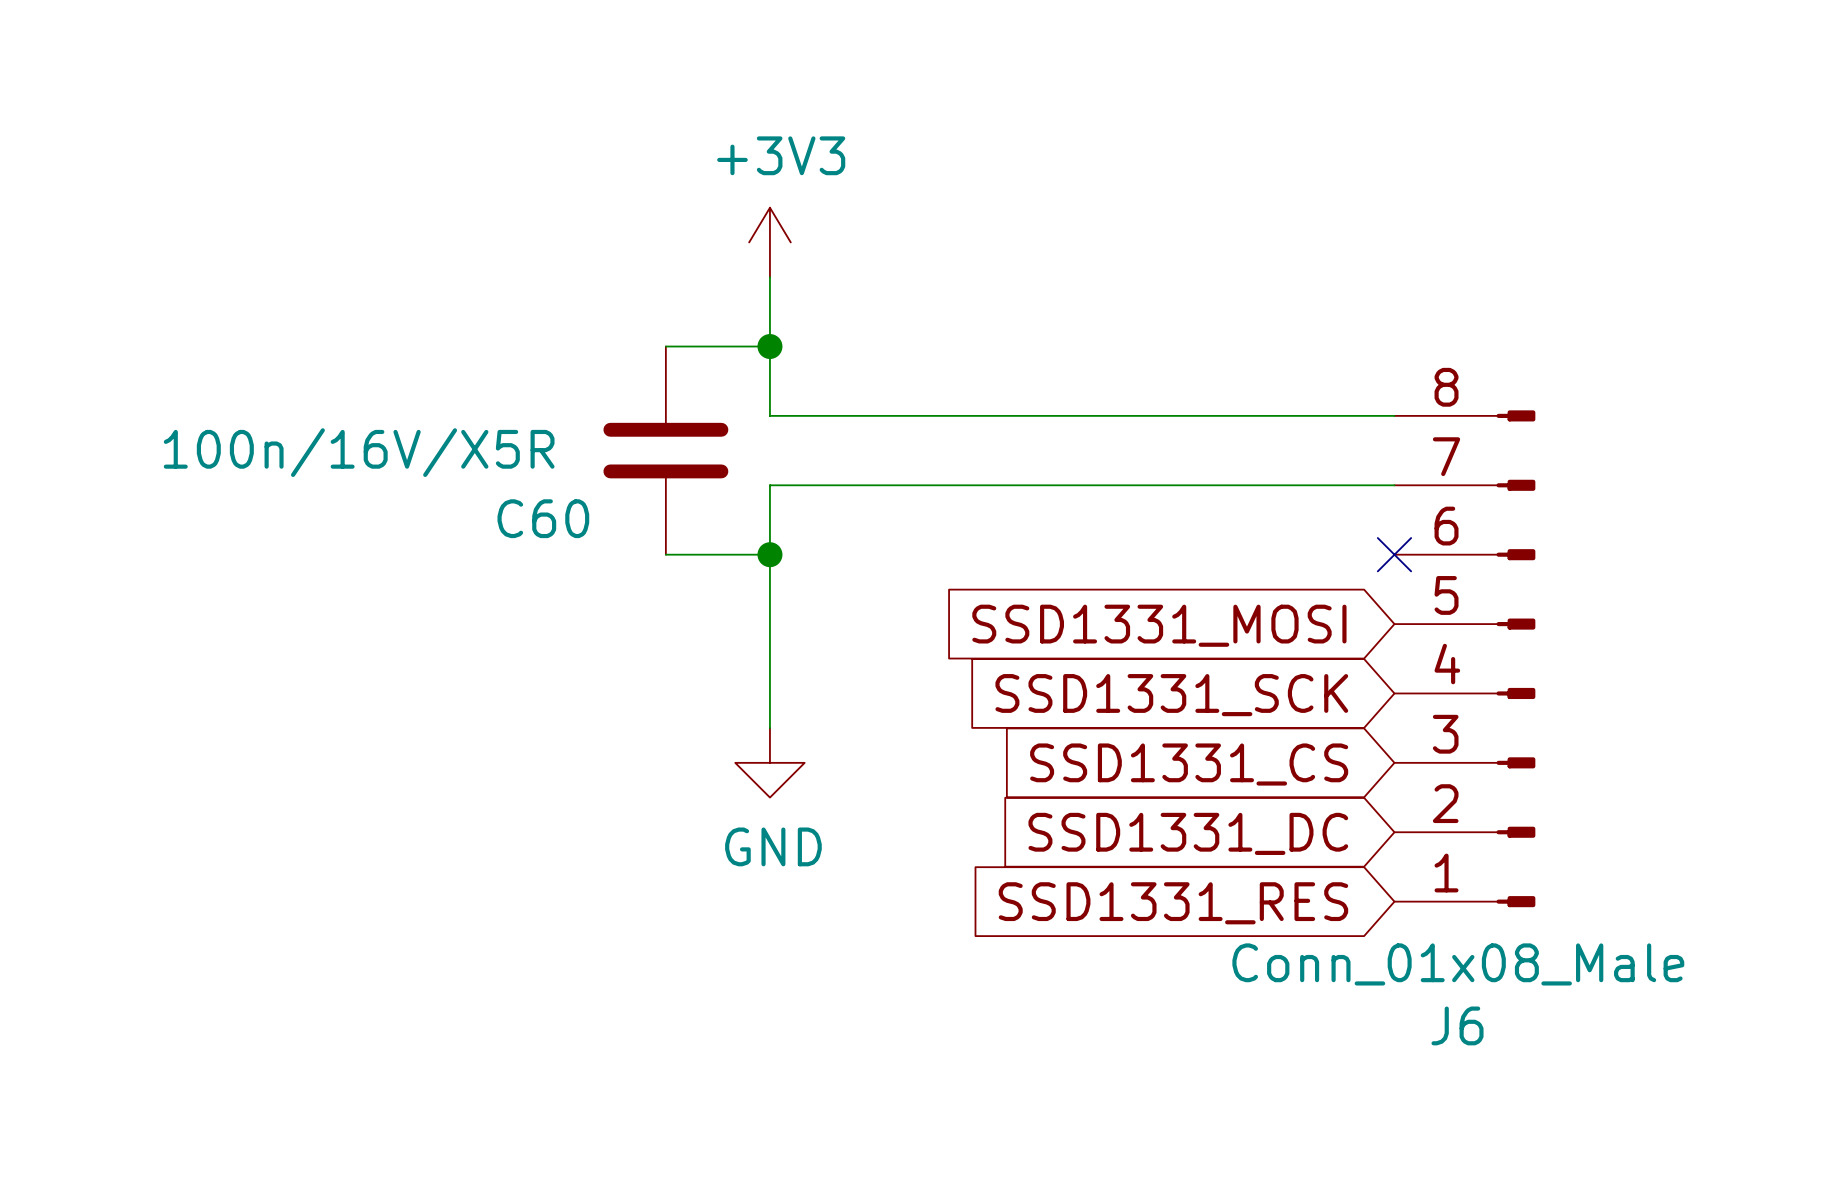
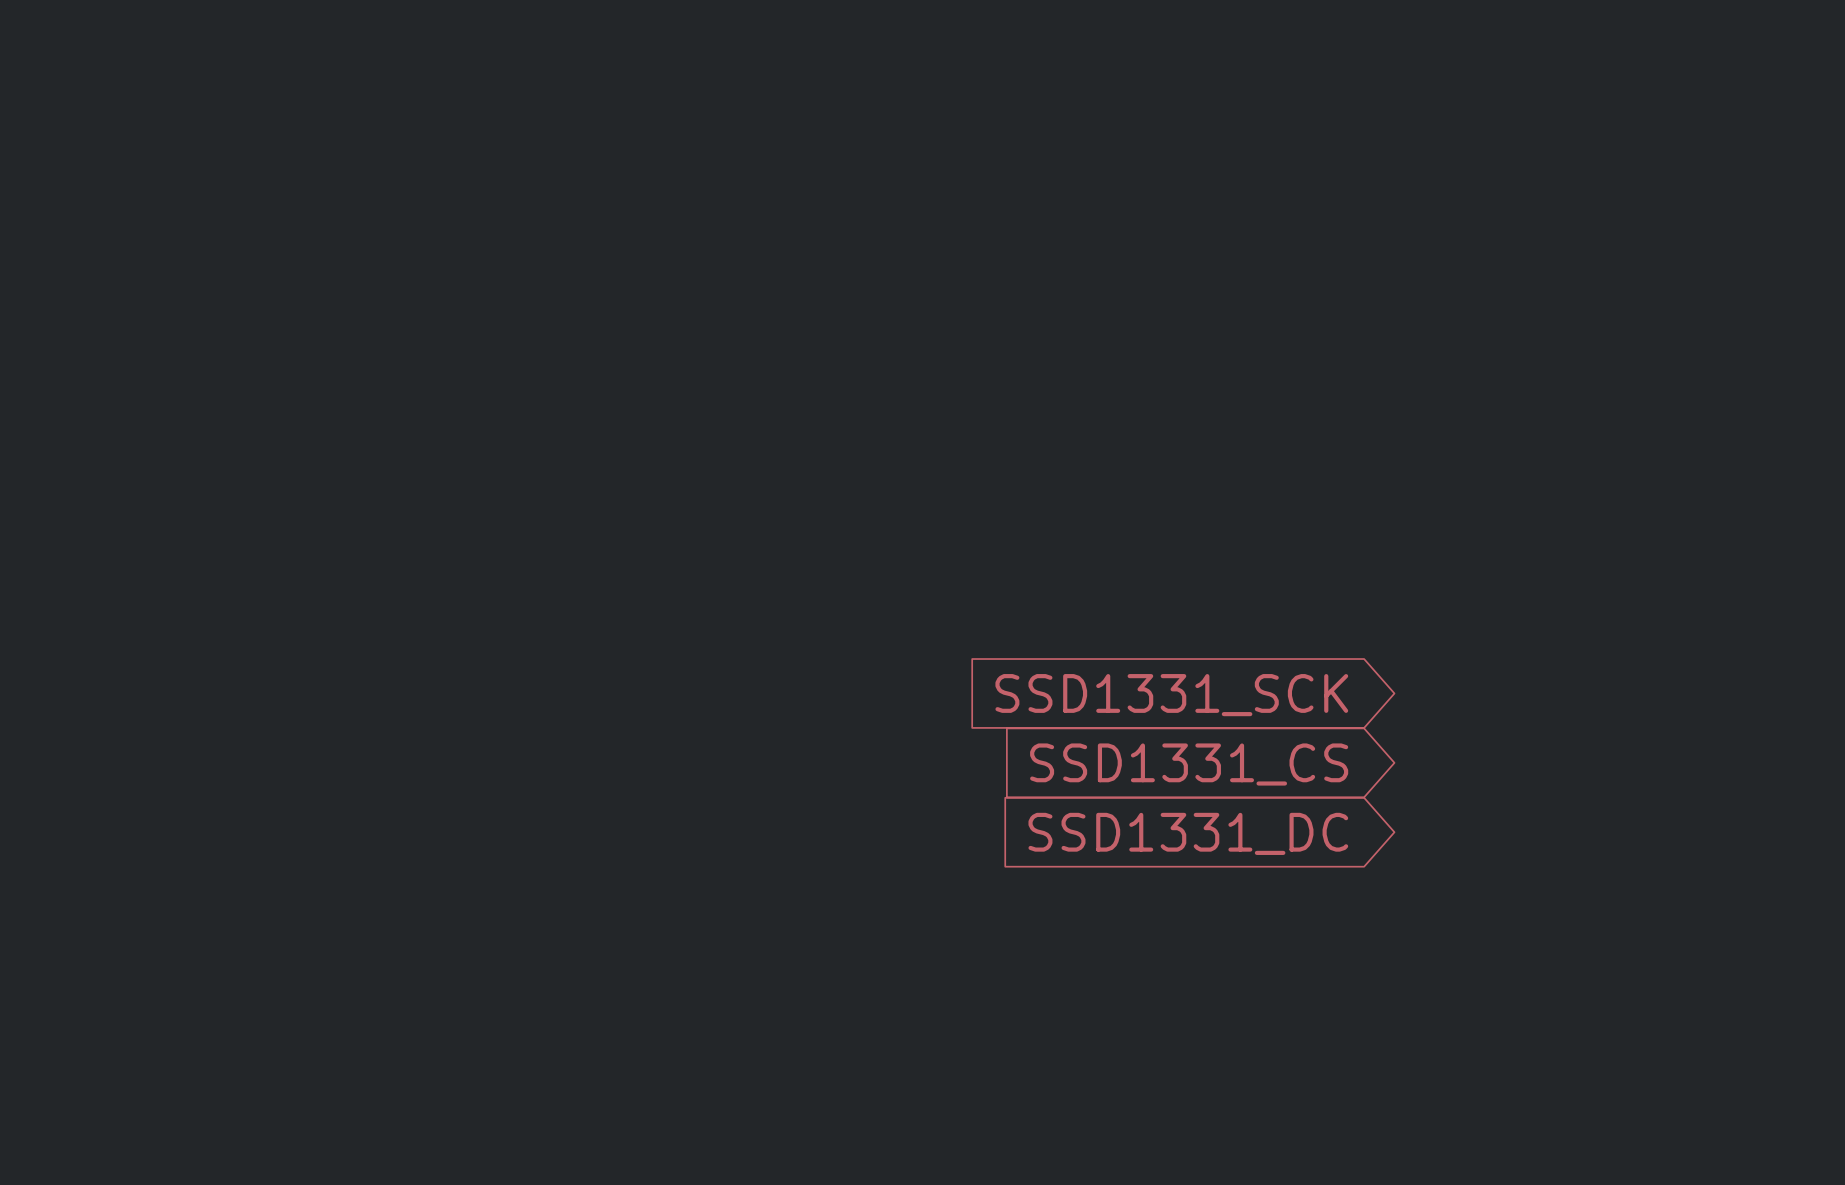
power symbol: +3V3 (769, 242) -> none
wire: (769, 277) (769, 415) (1394, 415) -> none
wire: (665, 346) (769, 346) -> none
junction: (769, 346) -> none
C60: 100n/16V/X5R (665, 450) -> none
wire: (1394, 485) (769, 485) (769, 728) -> none
wire: (665, 554) (769, 554) -> none
junction: (769, 554) -> none
no-connect mark: (1394, 554) -> none
global label: SSD1331_MOSI (1159, 625) -> none
J6: Conn_01x08_Male (1464, 658) -> none
power symbol: GND (769, 762) -> none
global label: SSD1331_RES (1173, 903) -> none

